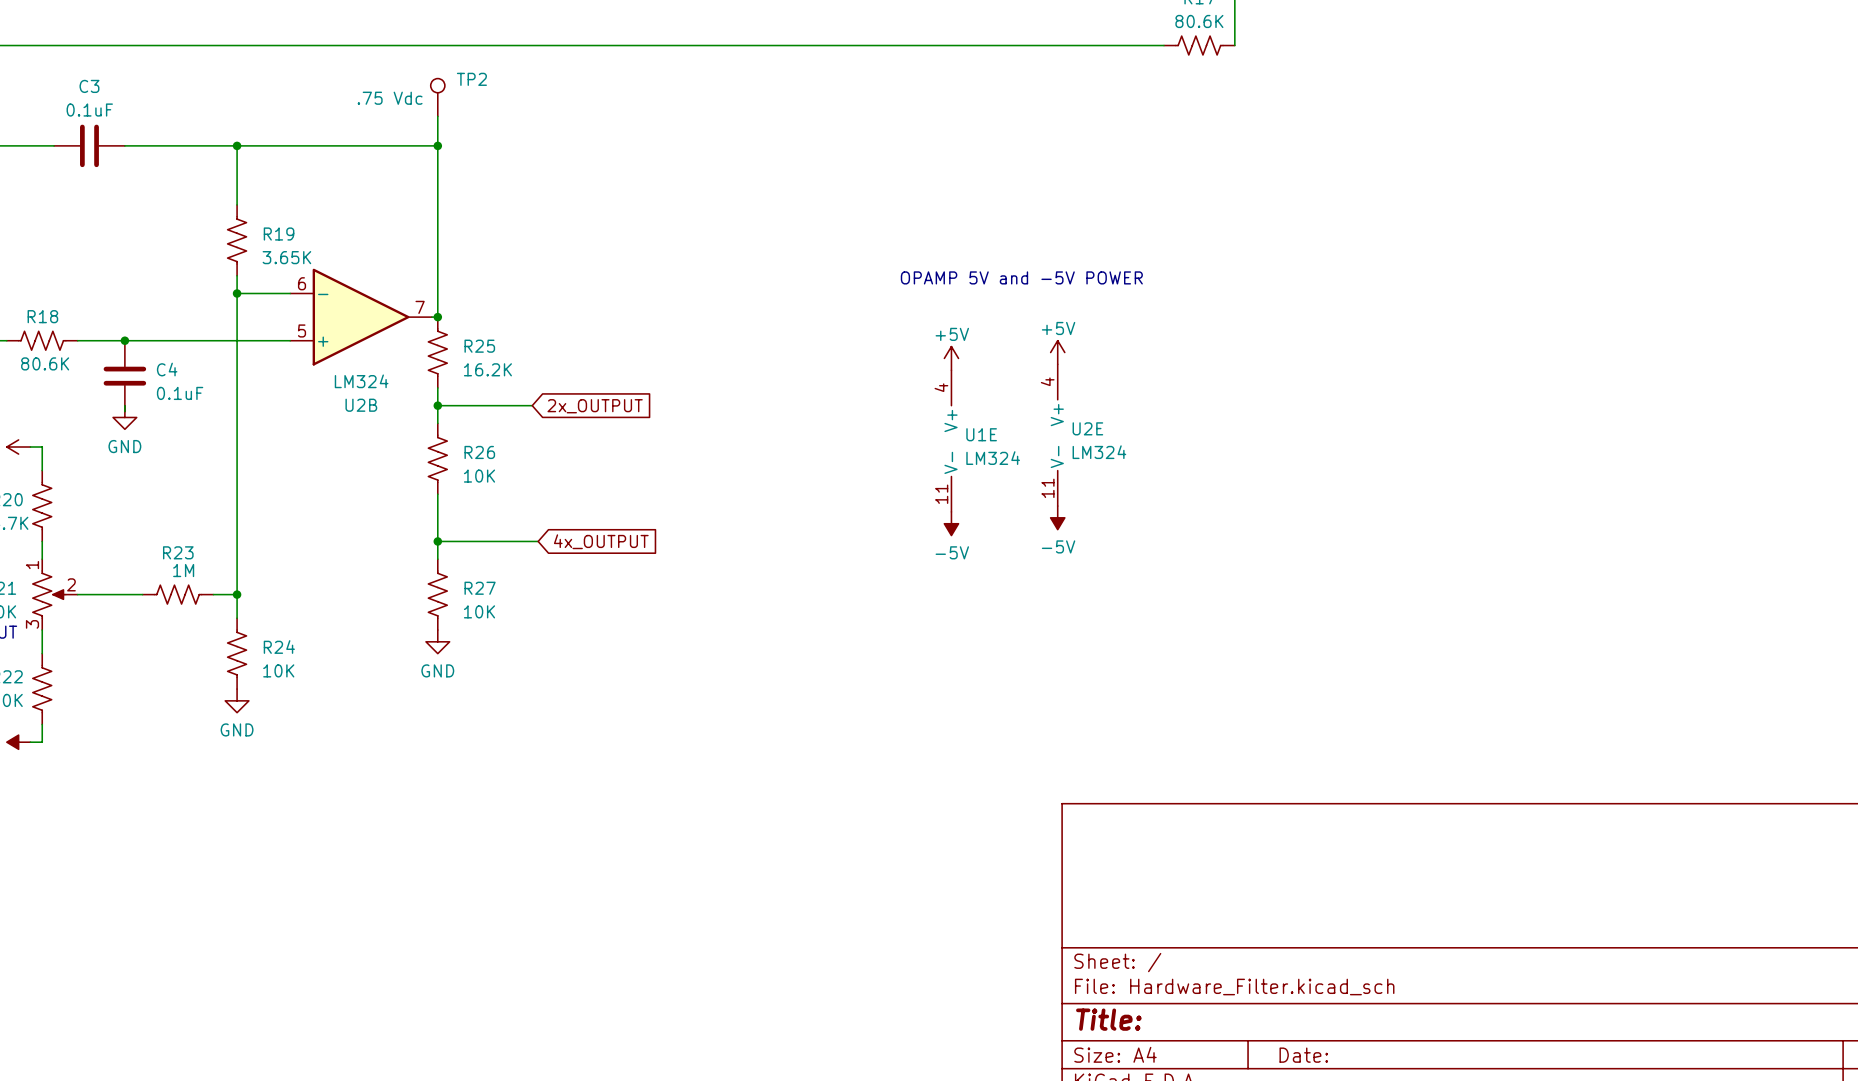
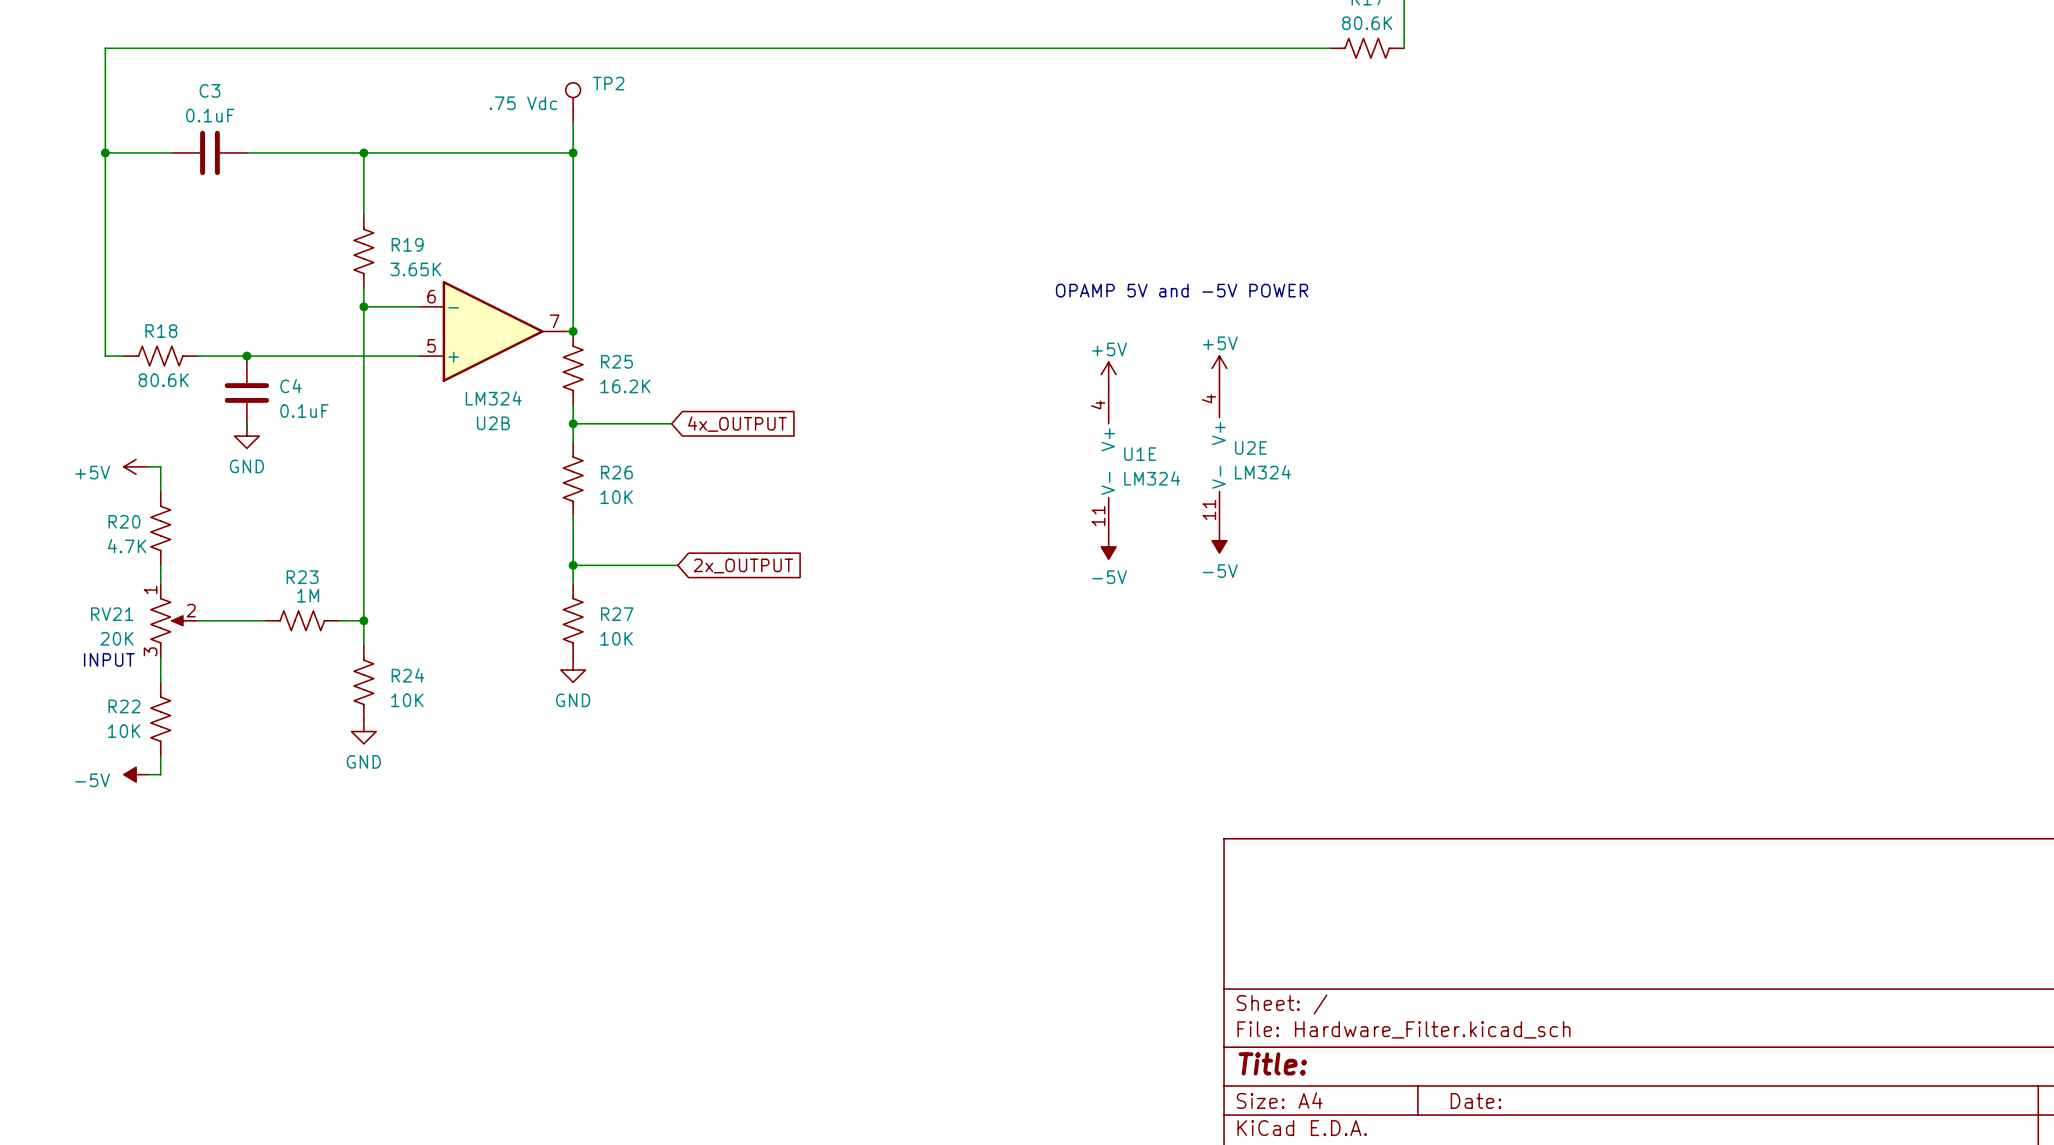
global label: 2x_OUTPUT (595, 406) -> 4x_OUTPUT (737, 424)
global label: 4x_OUTPUT (601, 541) -> 2x_OUTPUT (743, 565)

